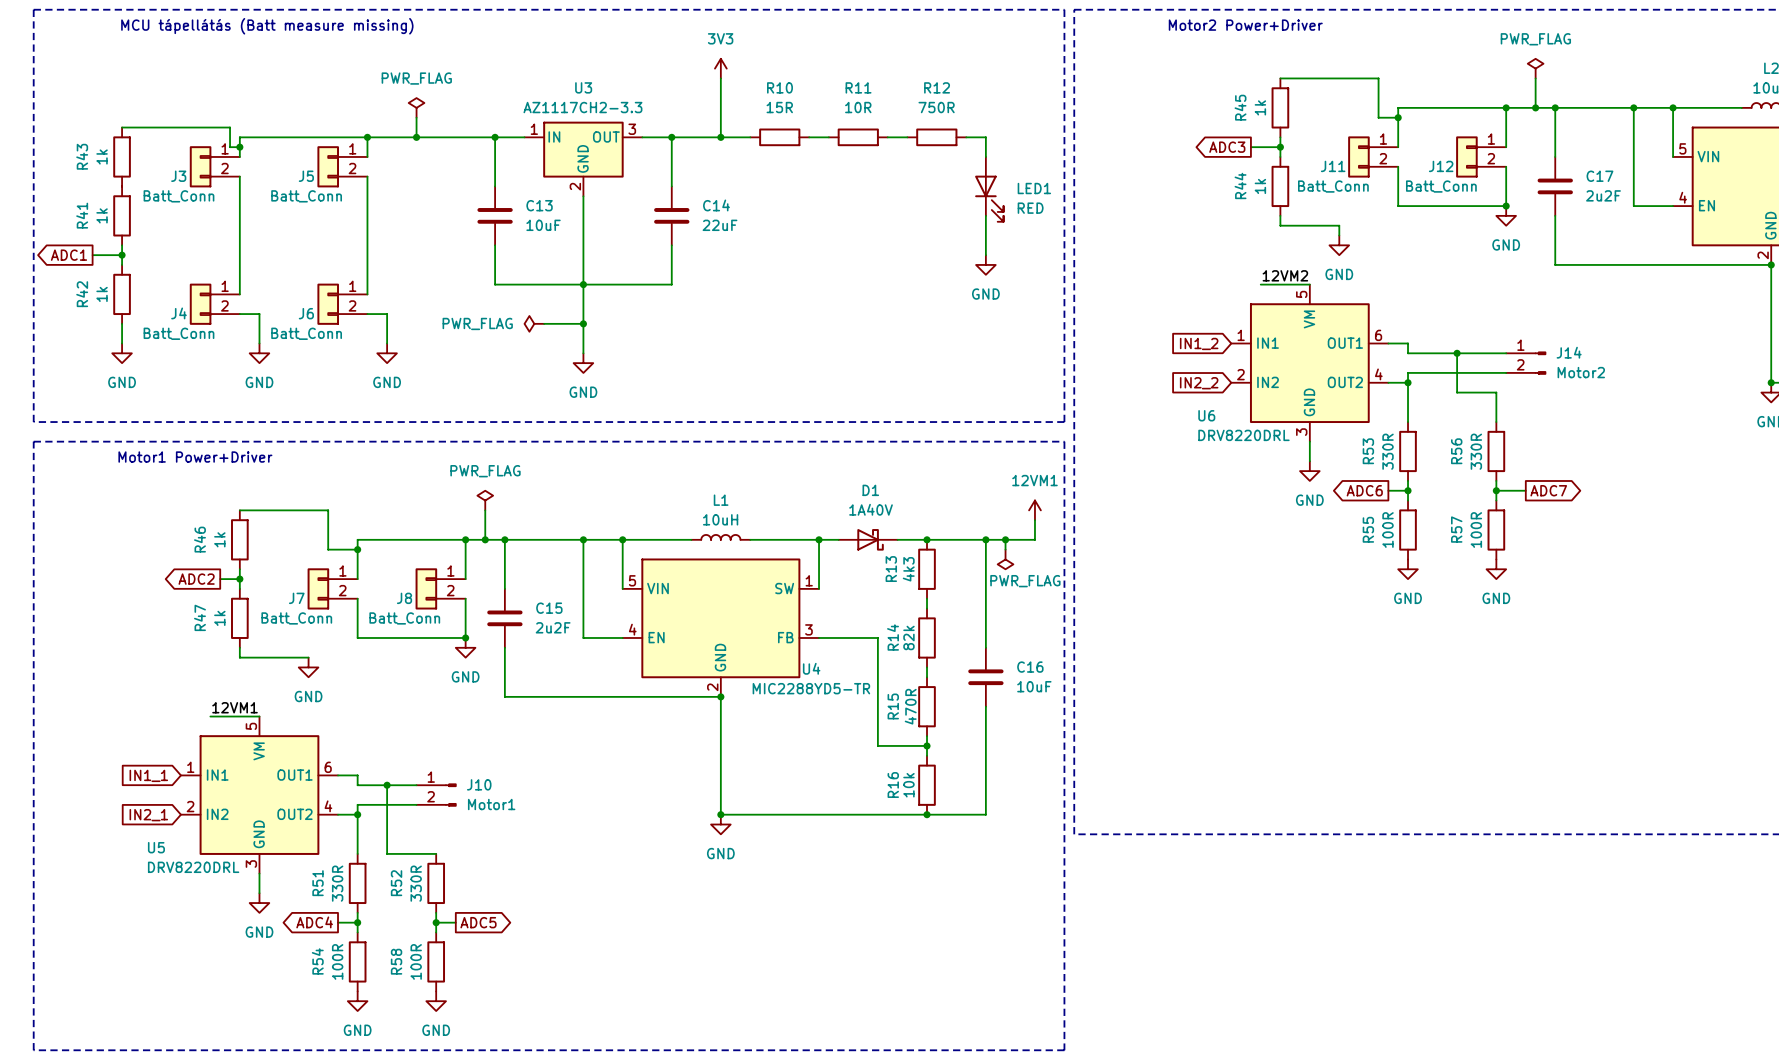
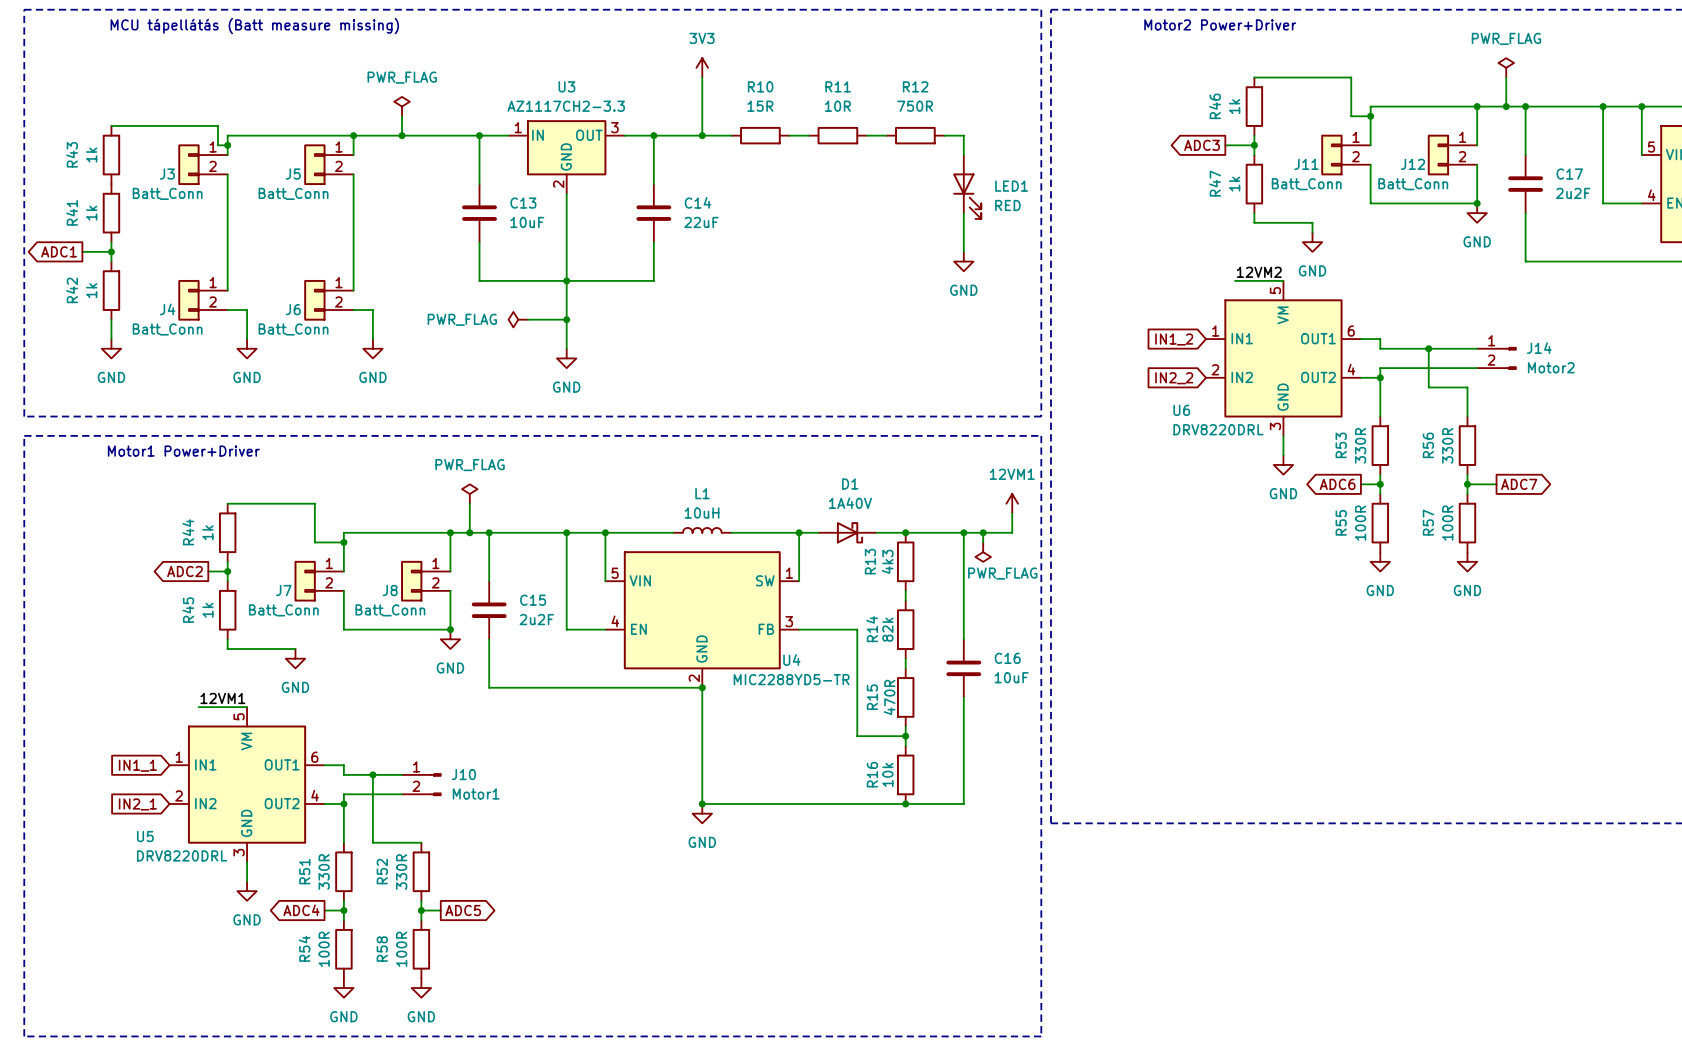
R45 name: R45 (1240, 107) -> R46 (1215, 106)
R44 name: R44 (1240, 185) -> R47 (1215, 183)
R46 name: R46 (199, 539) -> R44 (188, 532)
R47 name: R47 (199, 617) -> R45 (188, 610)

